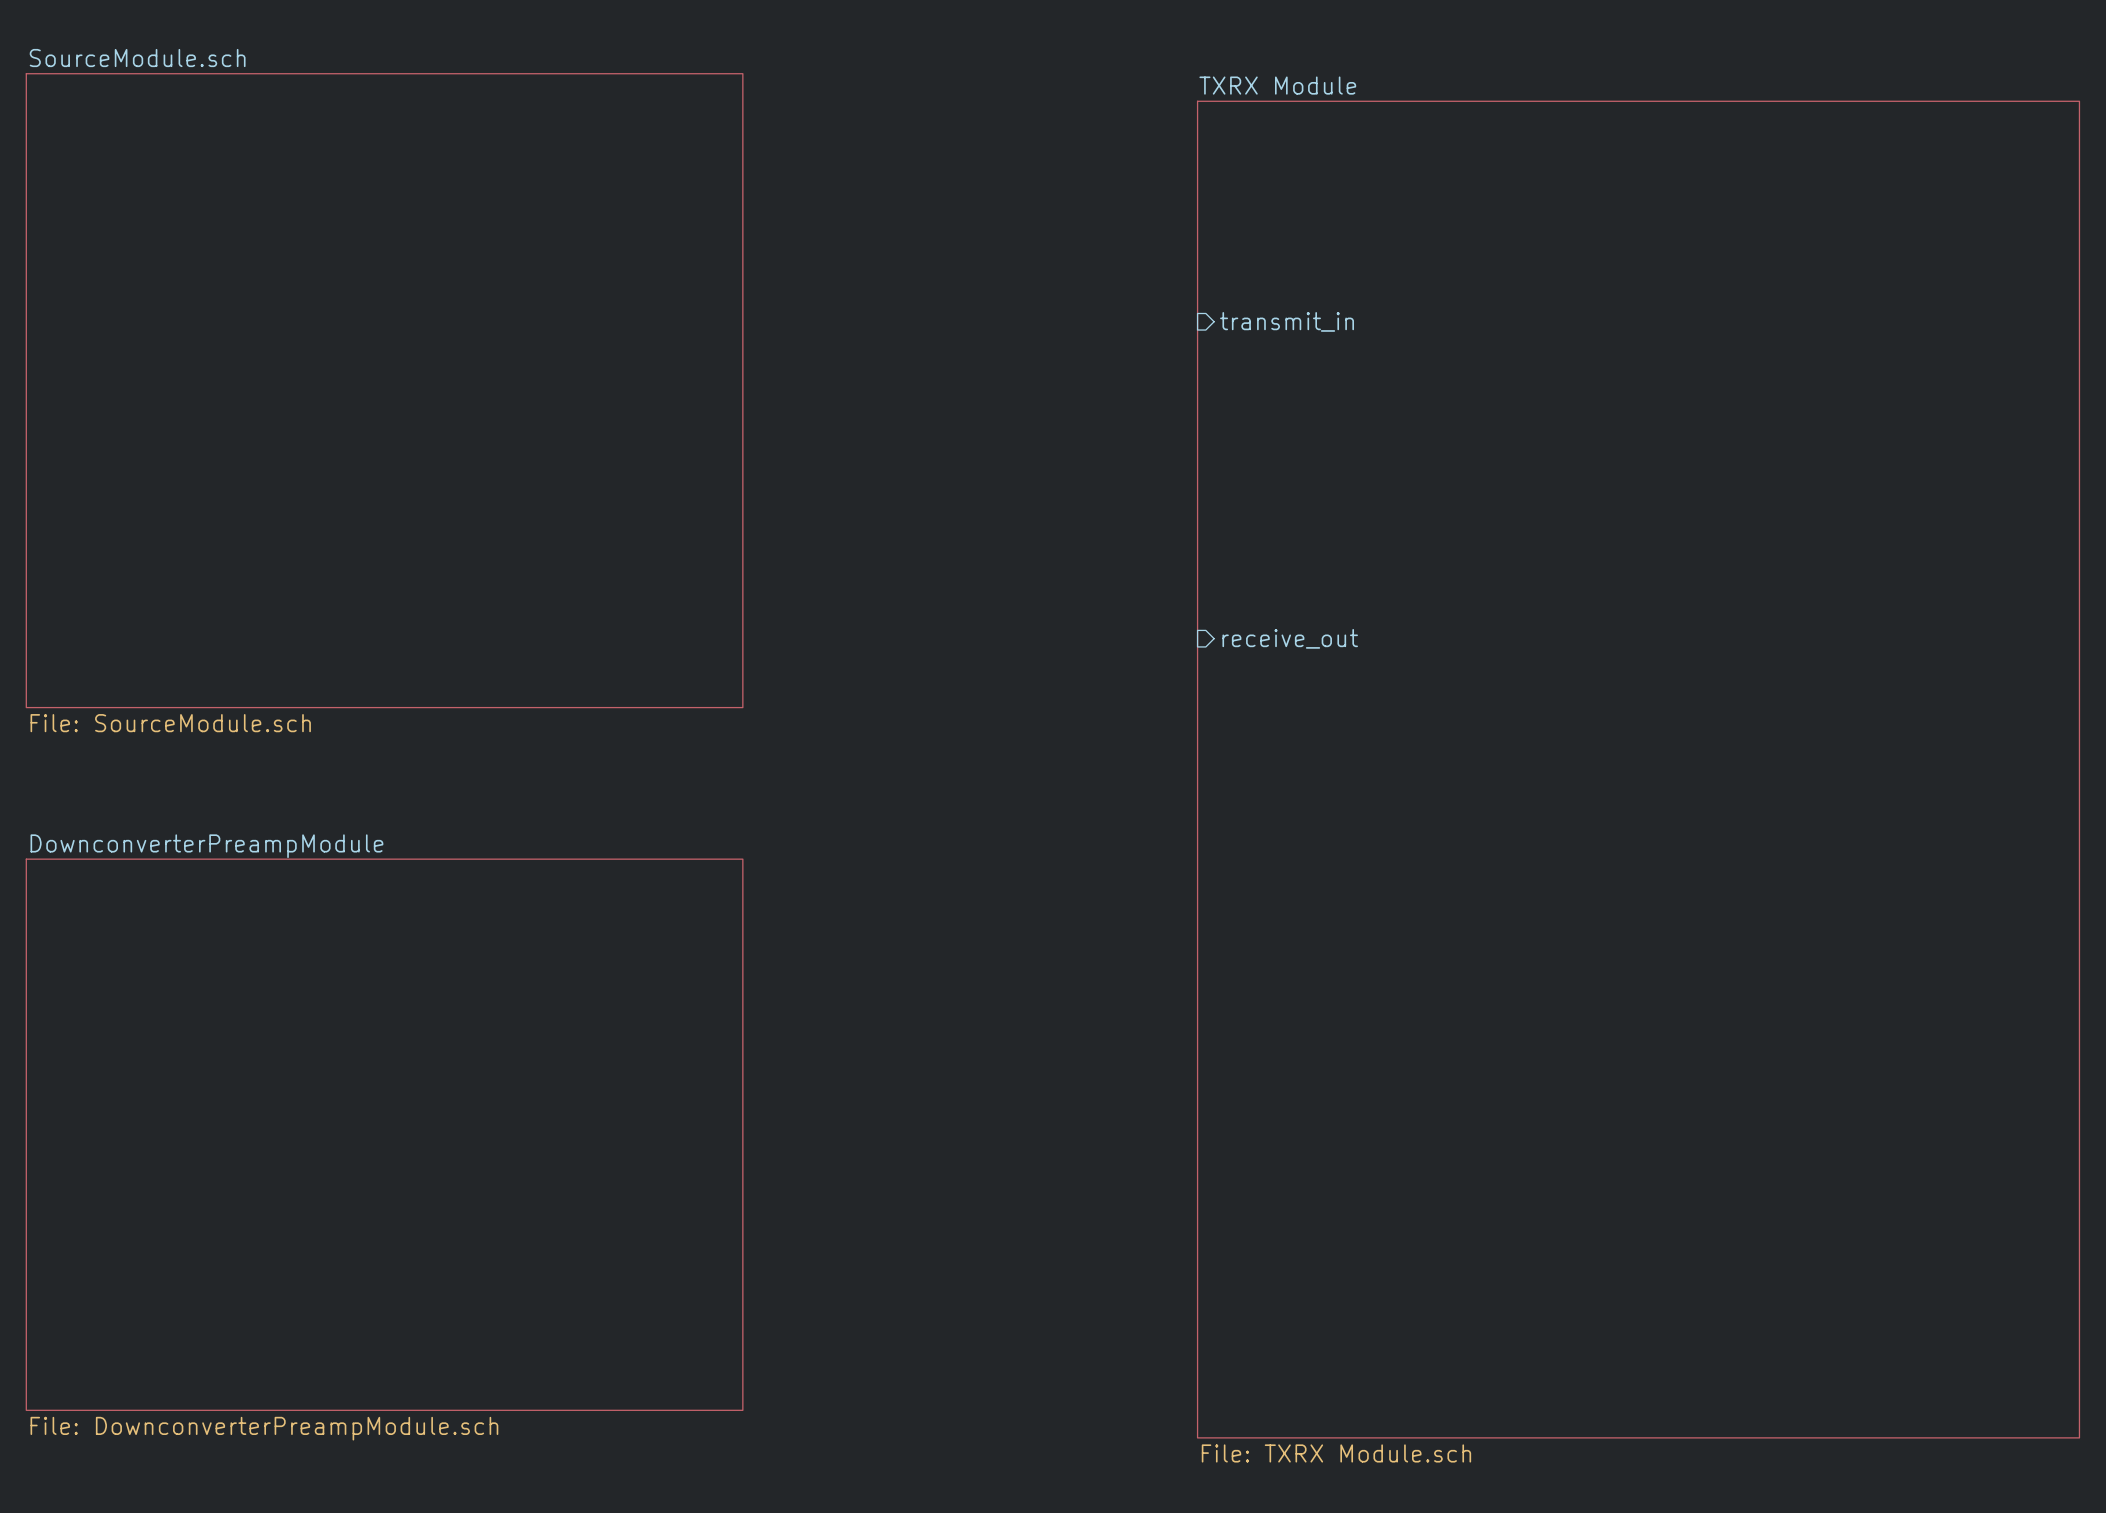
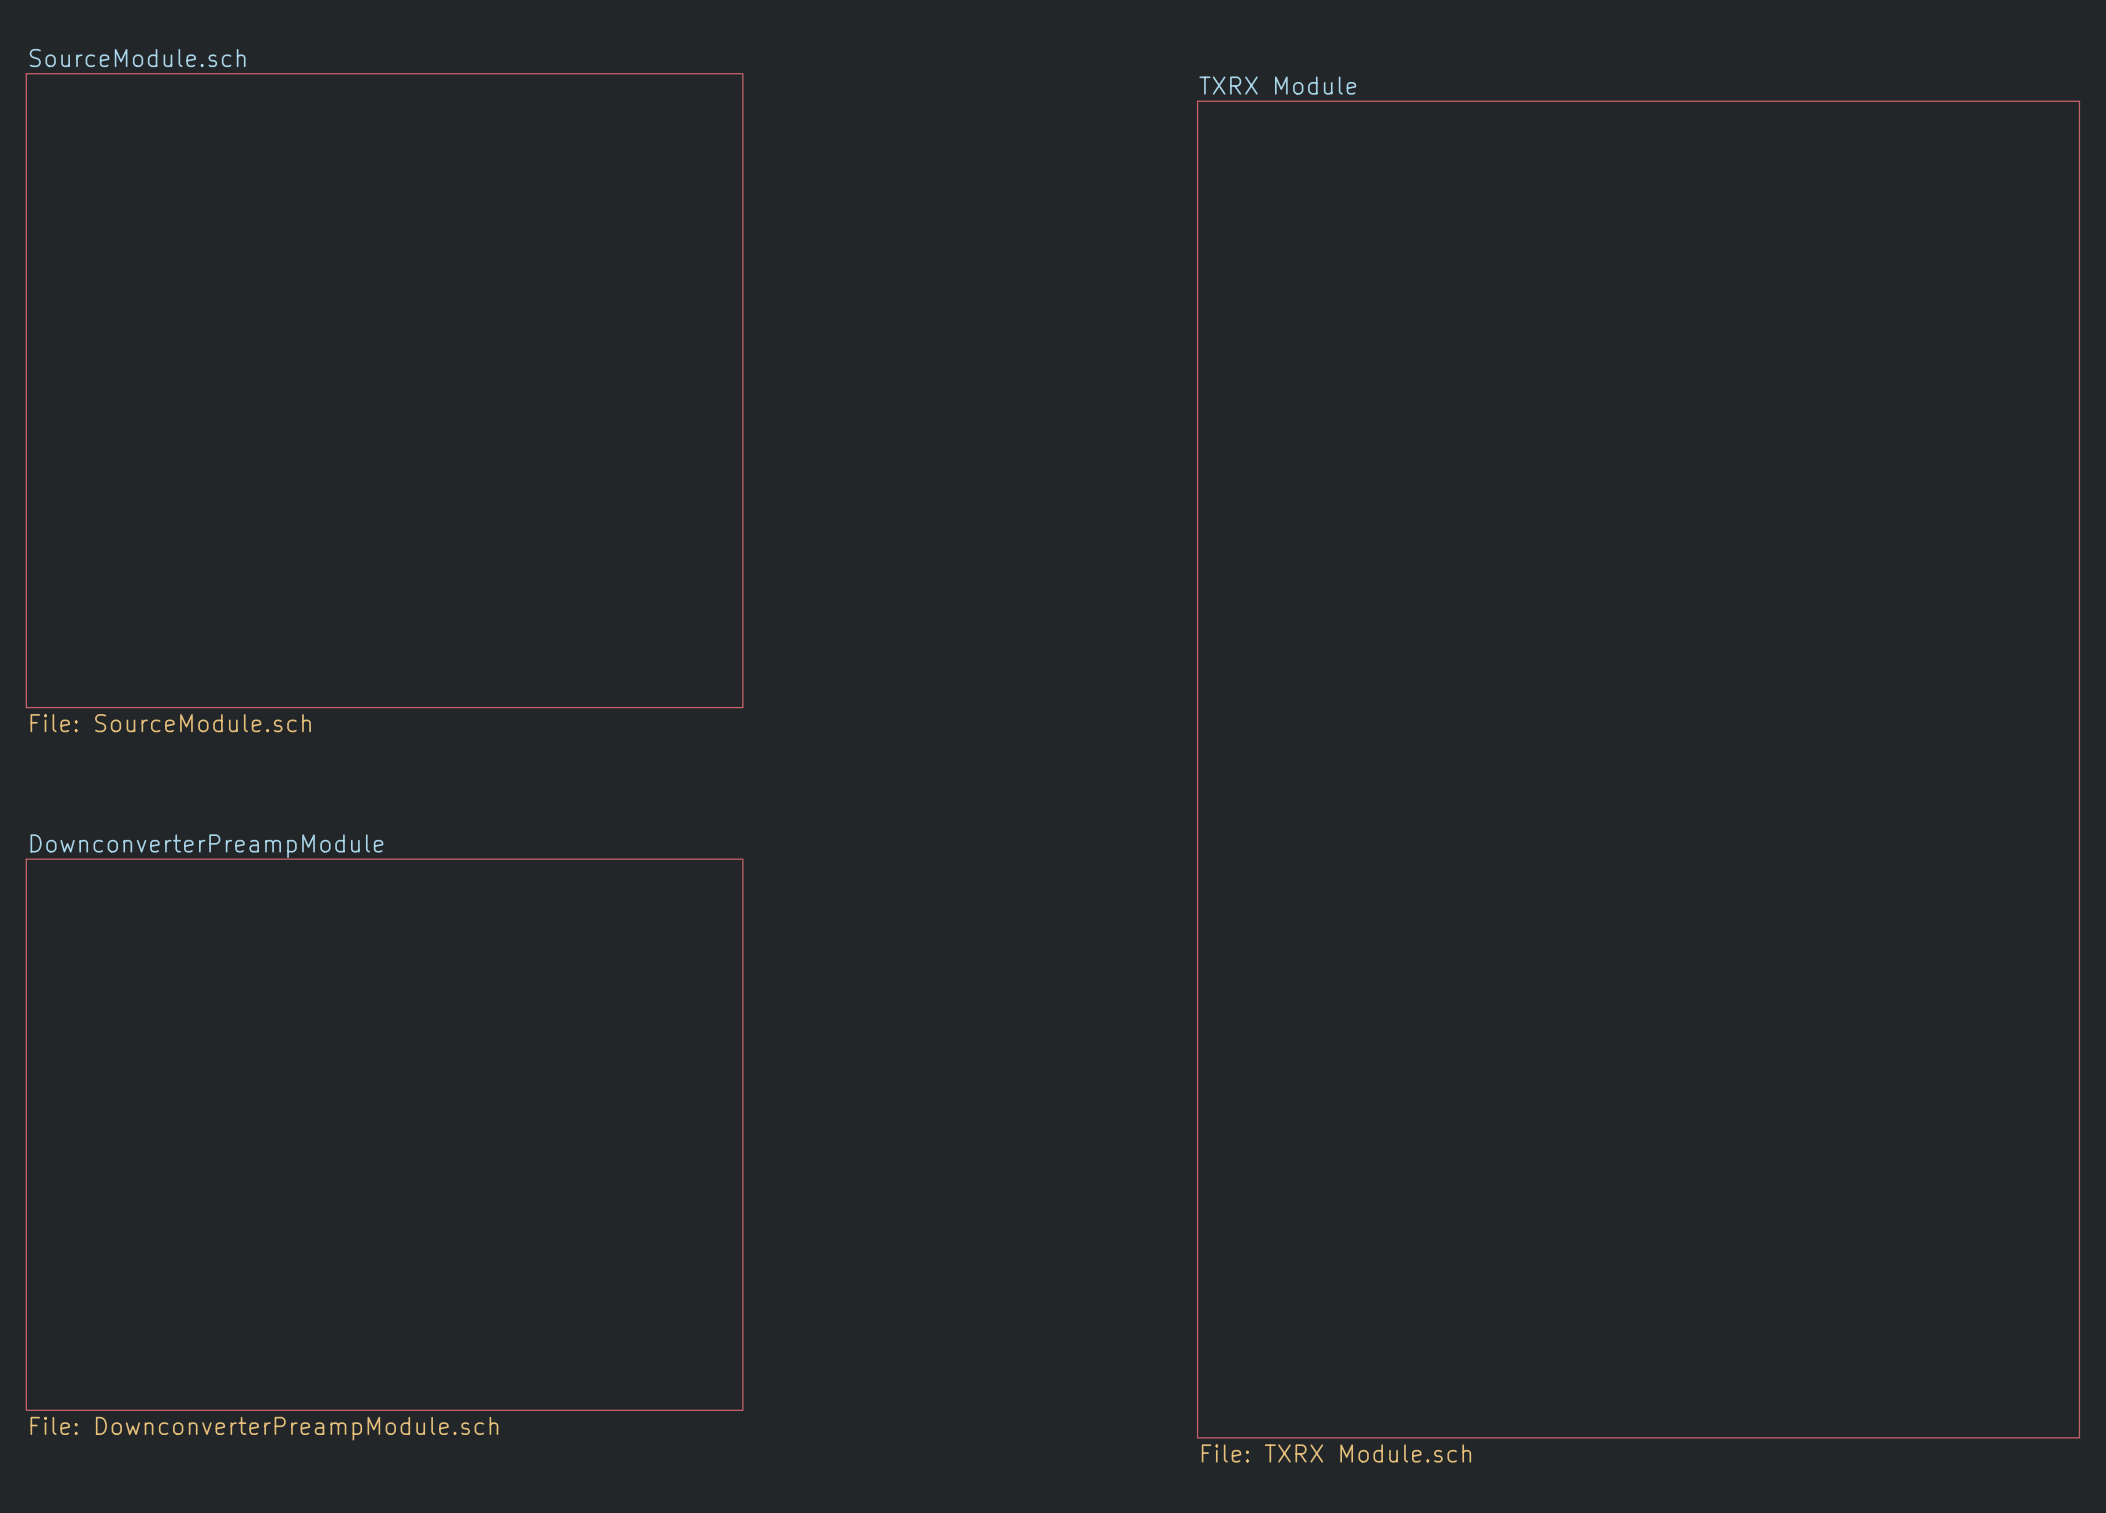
sheet pin: transmit_in (1287, 321) -> none
sheet pin: receive_out (1290, 638) -> none

